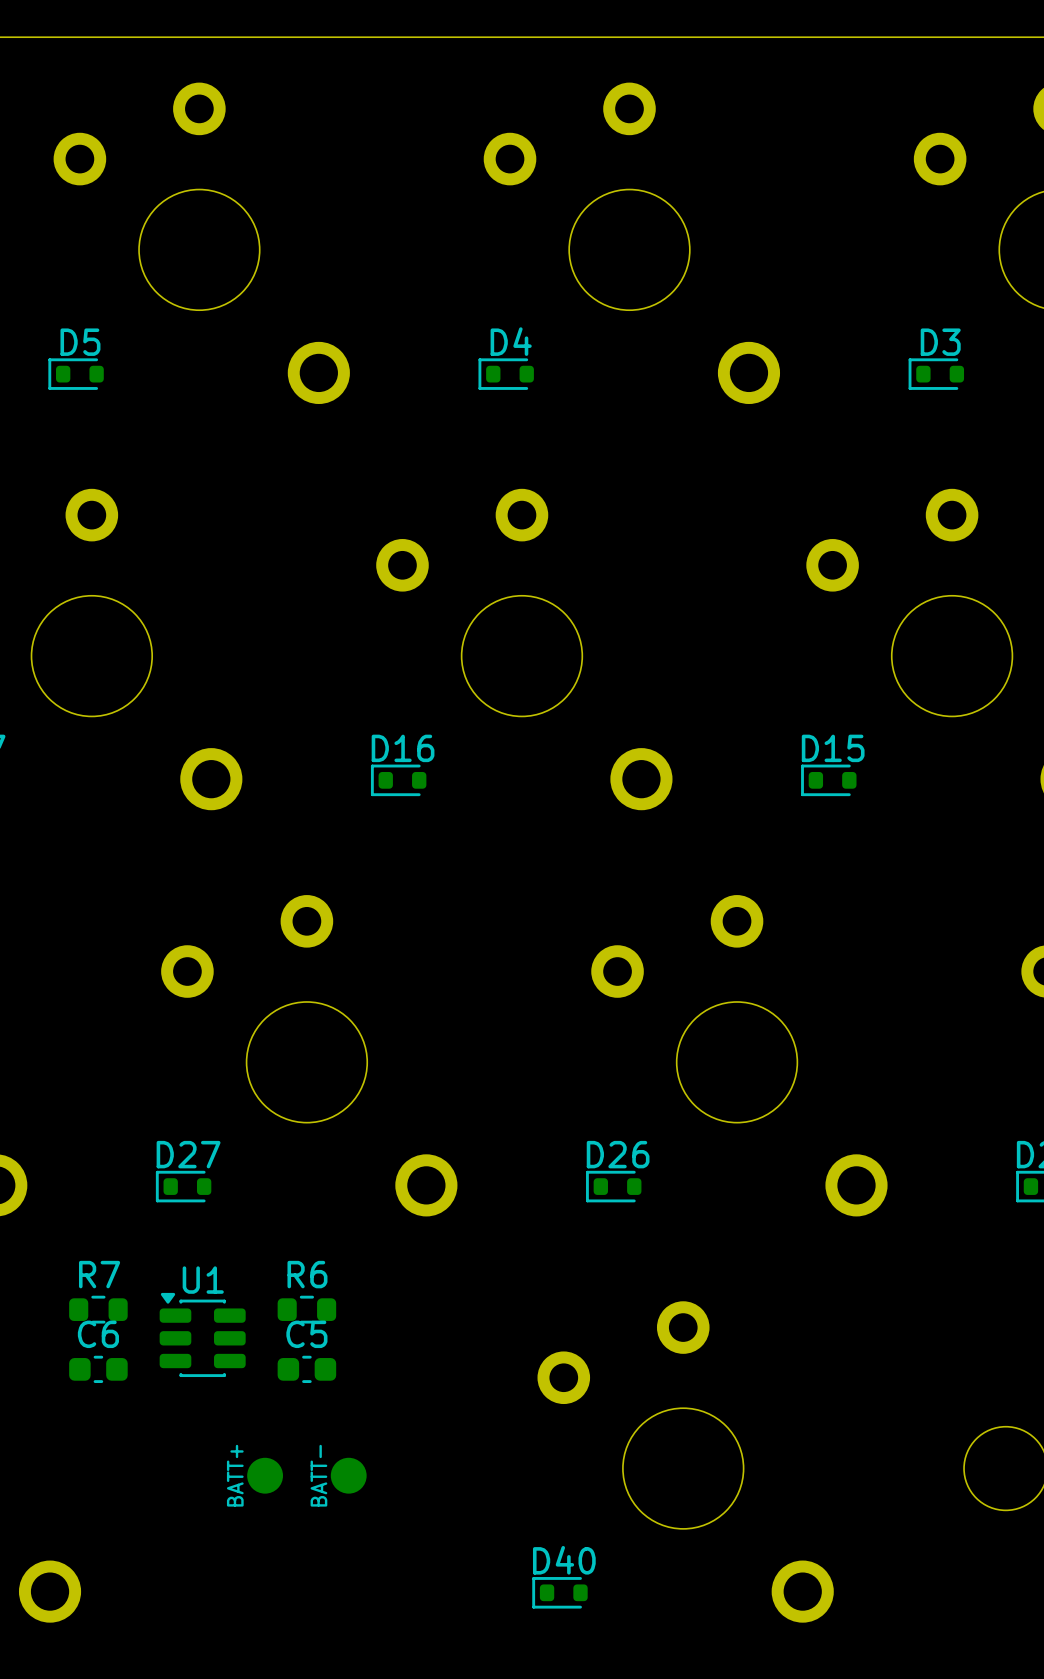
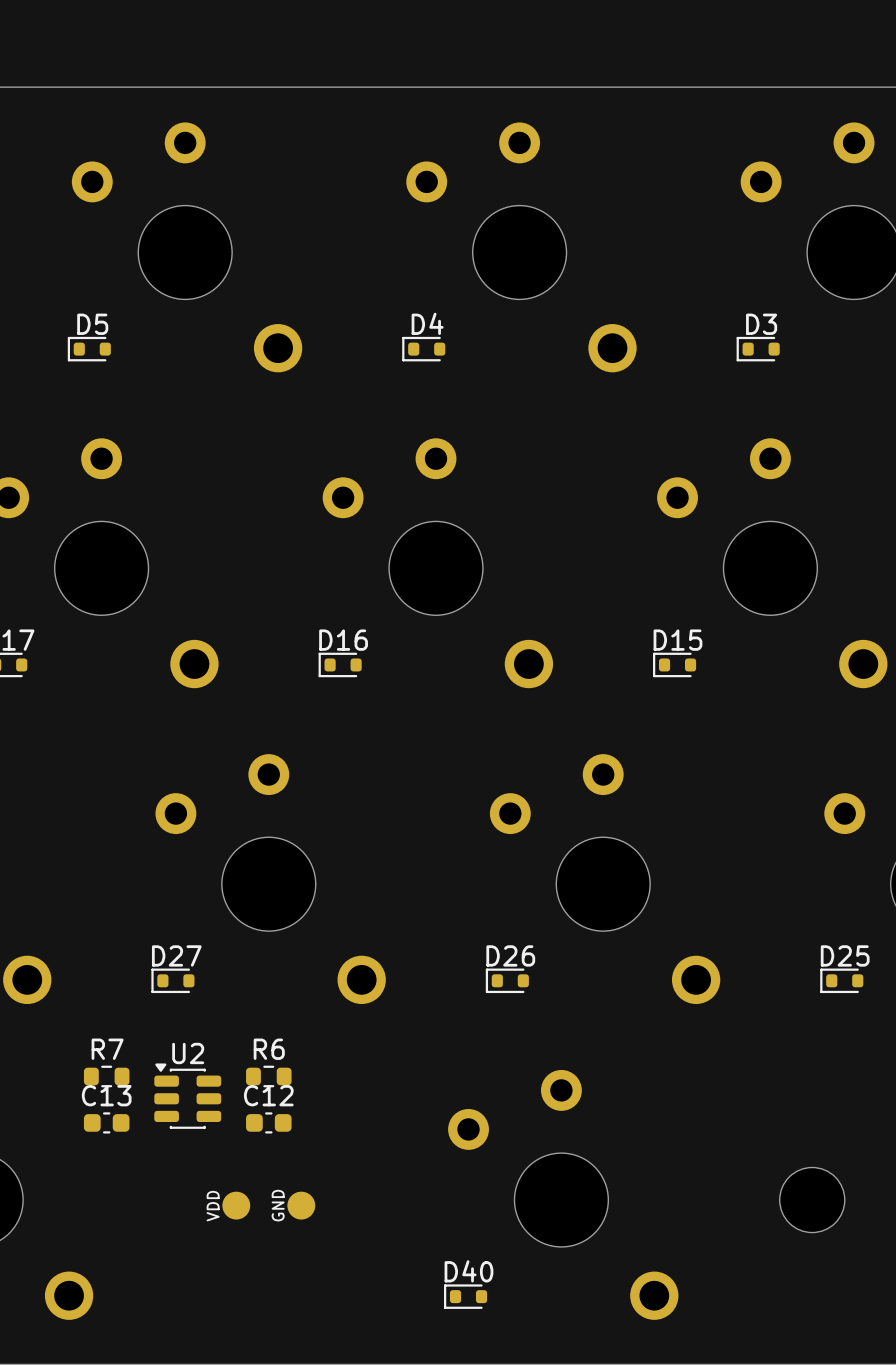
U1 name: U1 (203, 1280) -> U2 (188, 1053)
C6 name: C6 (98, 1334) -> C13 (106, 1095)
C5 name: C5 (306, 1334) -> C12 (268, 1095)
text: BATT+ (235, 1475) -> VDD (213, 1206)
text: BATT- (318, 1475) -> GND (278, 1205)

